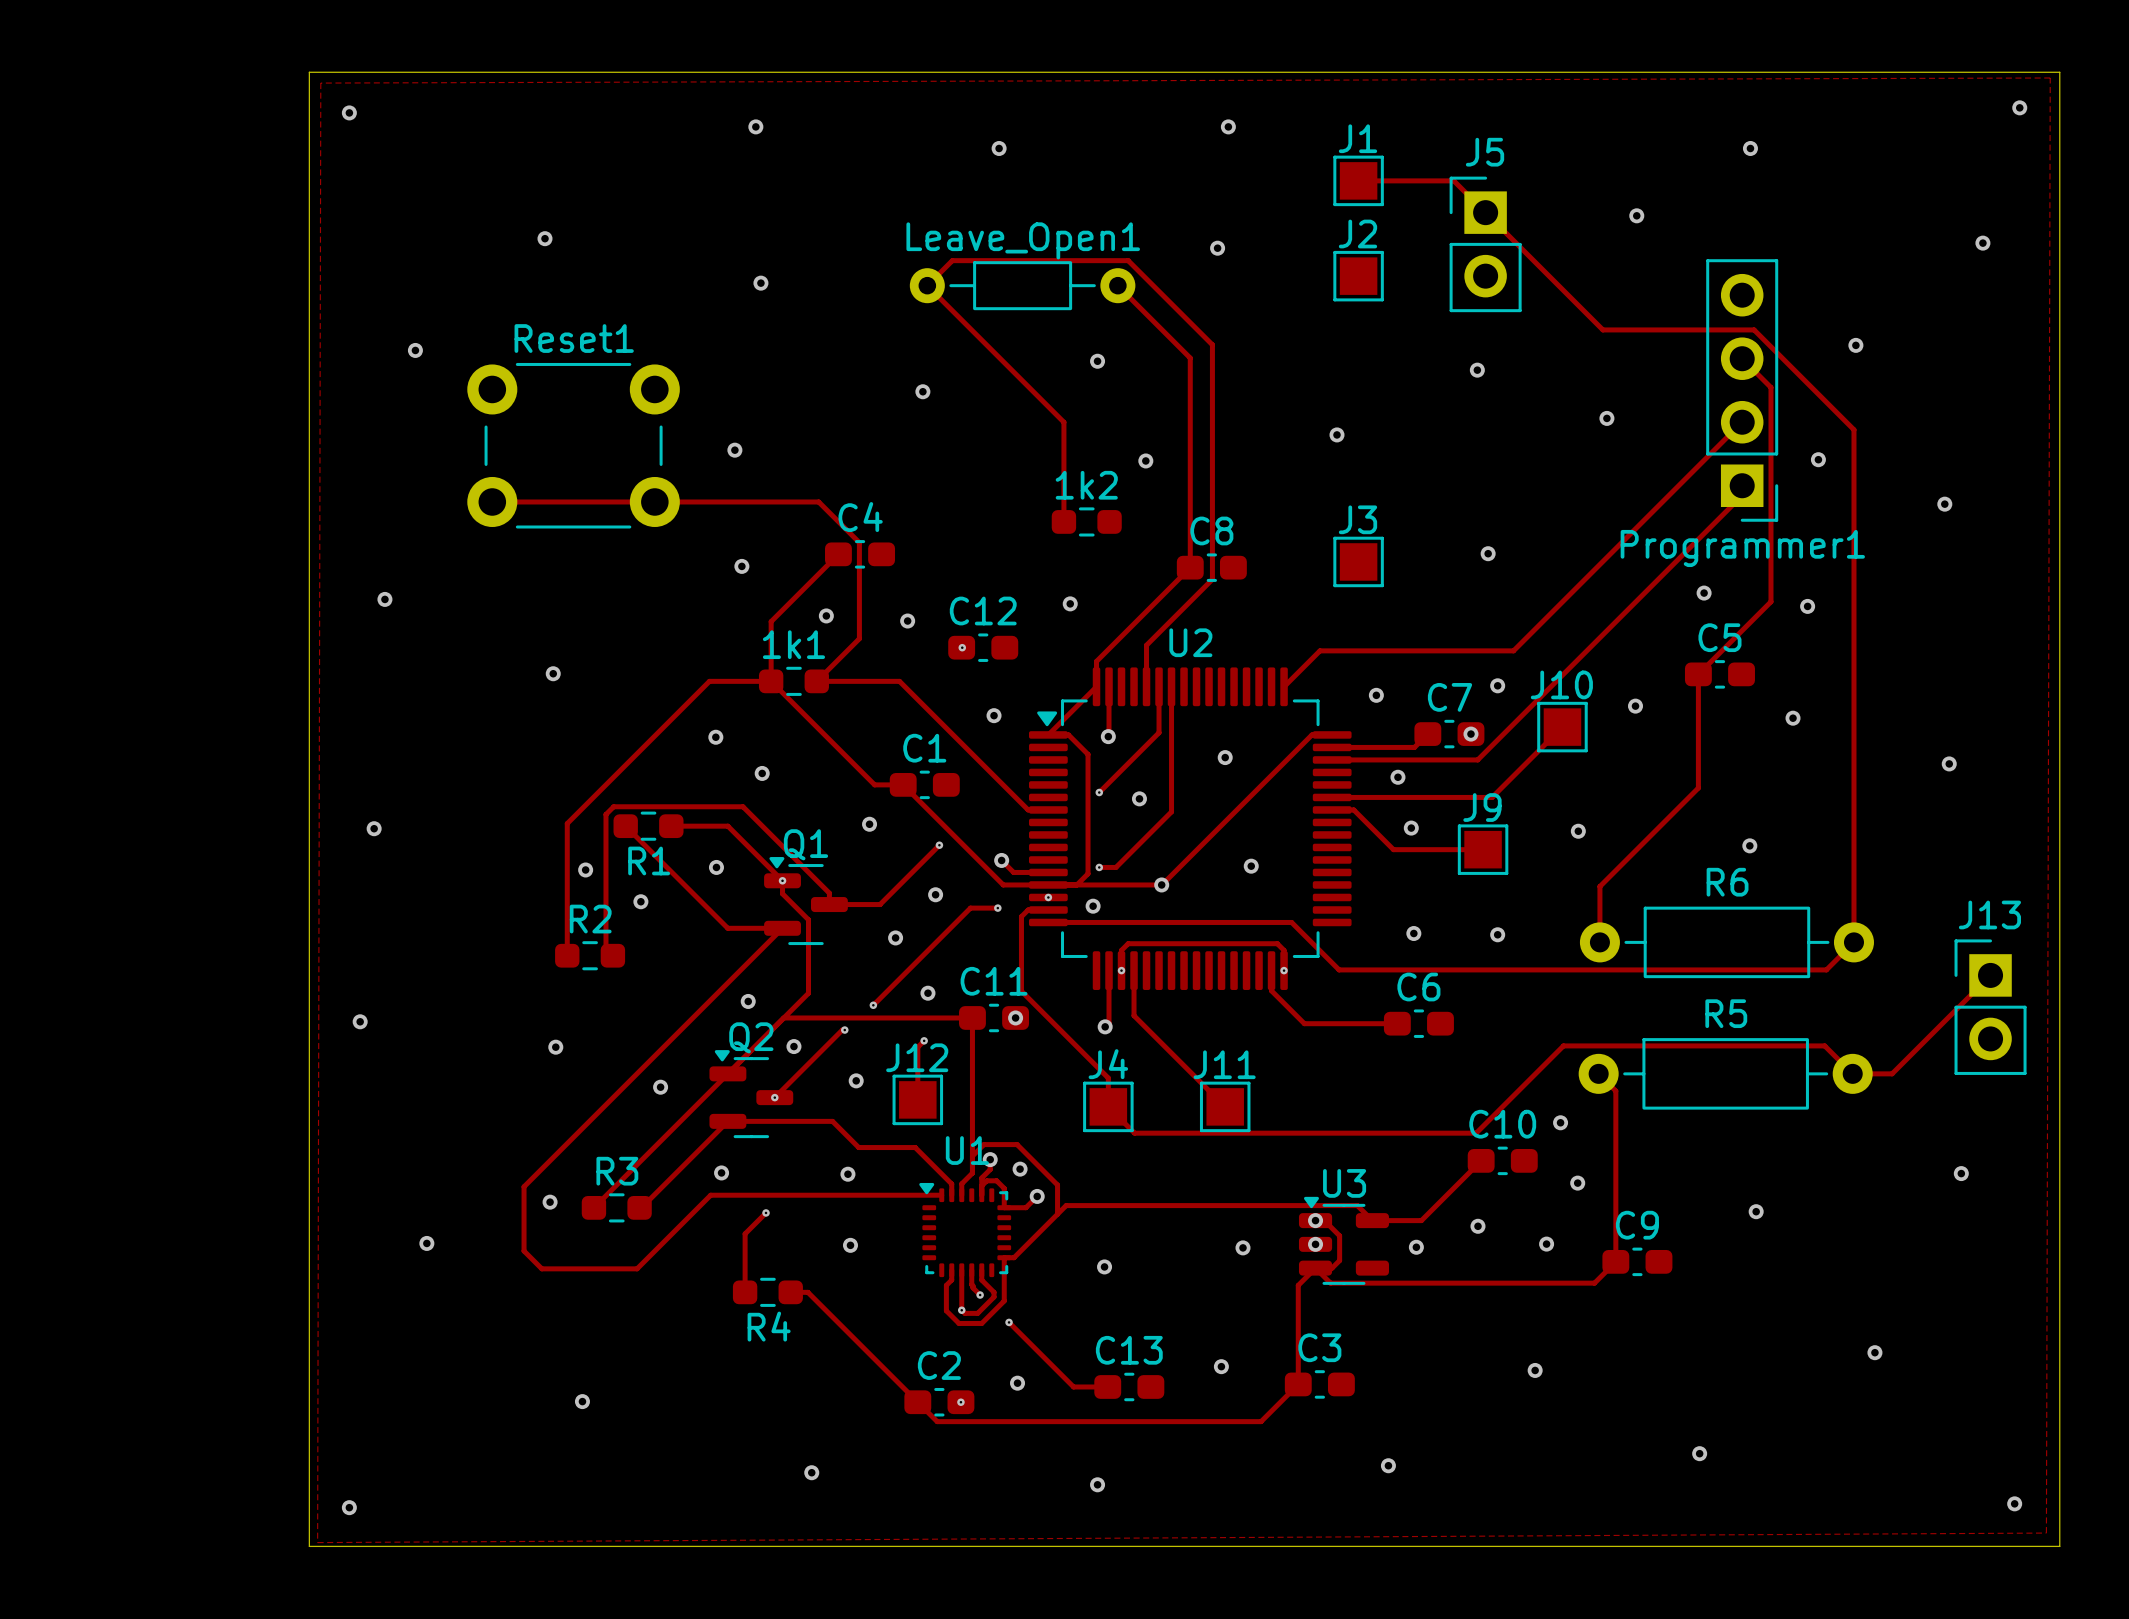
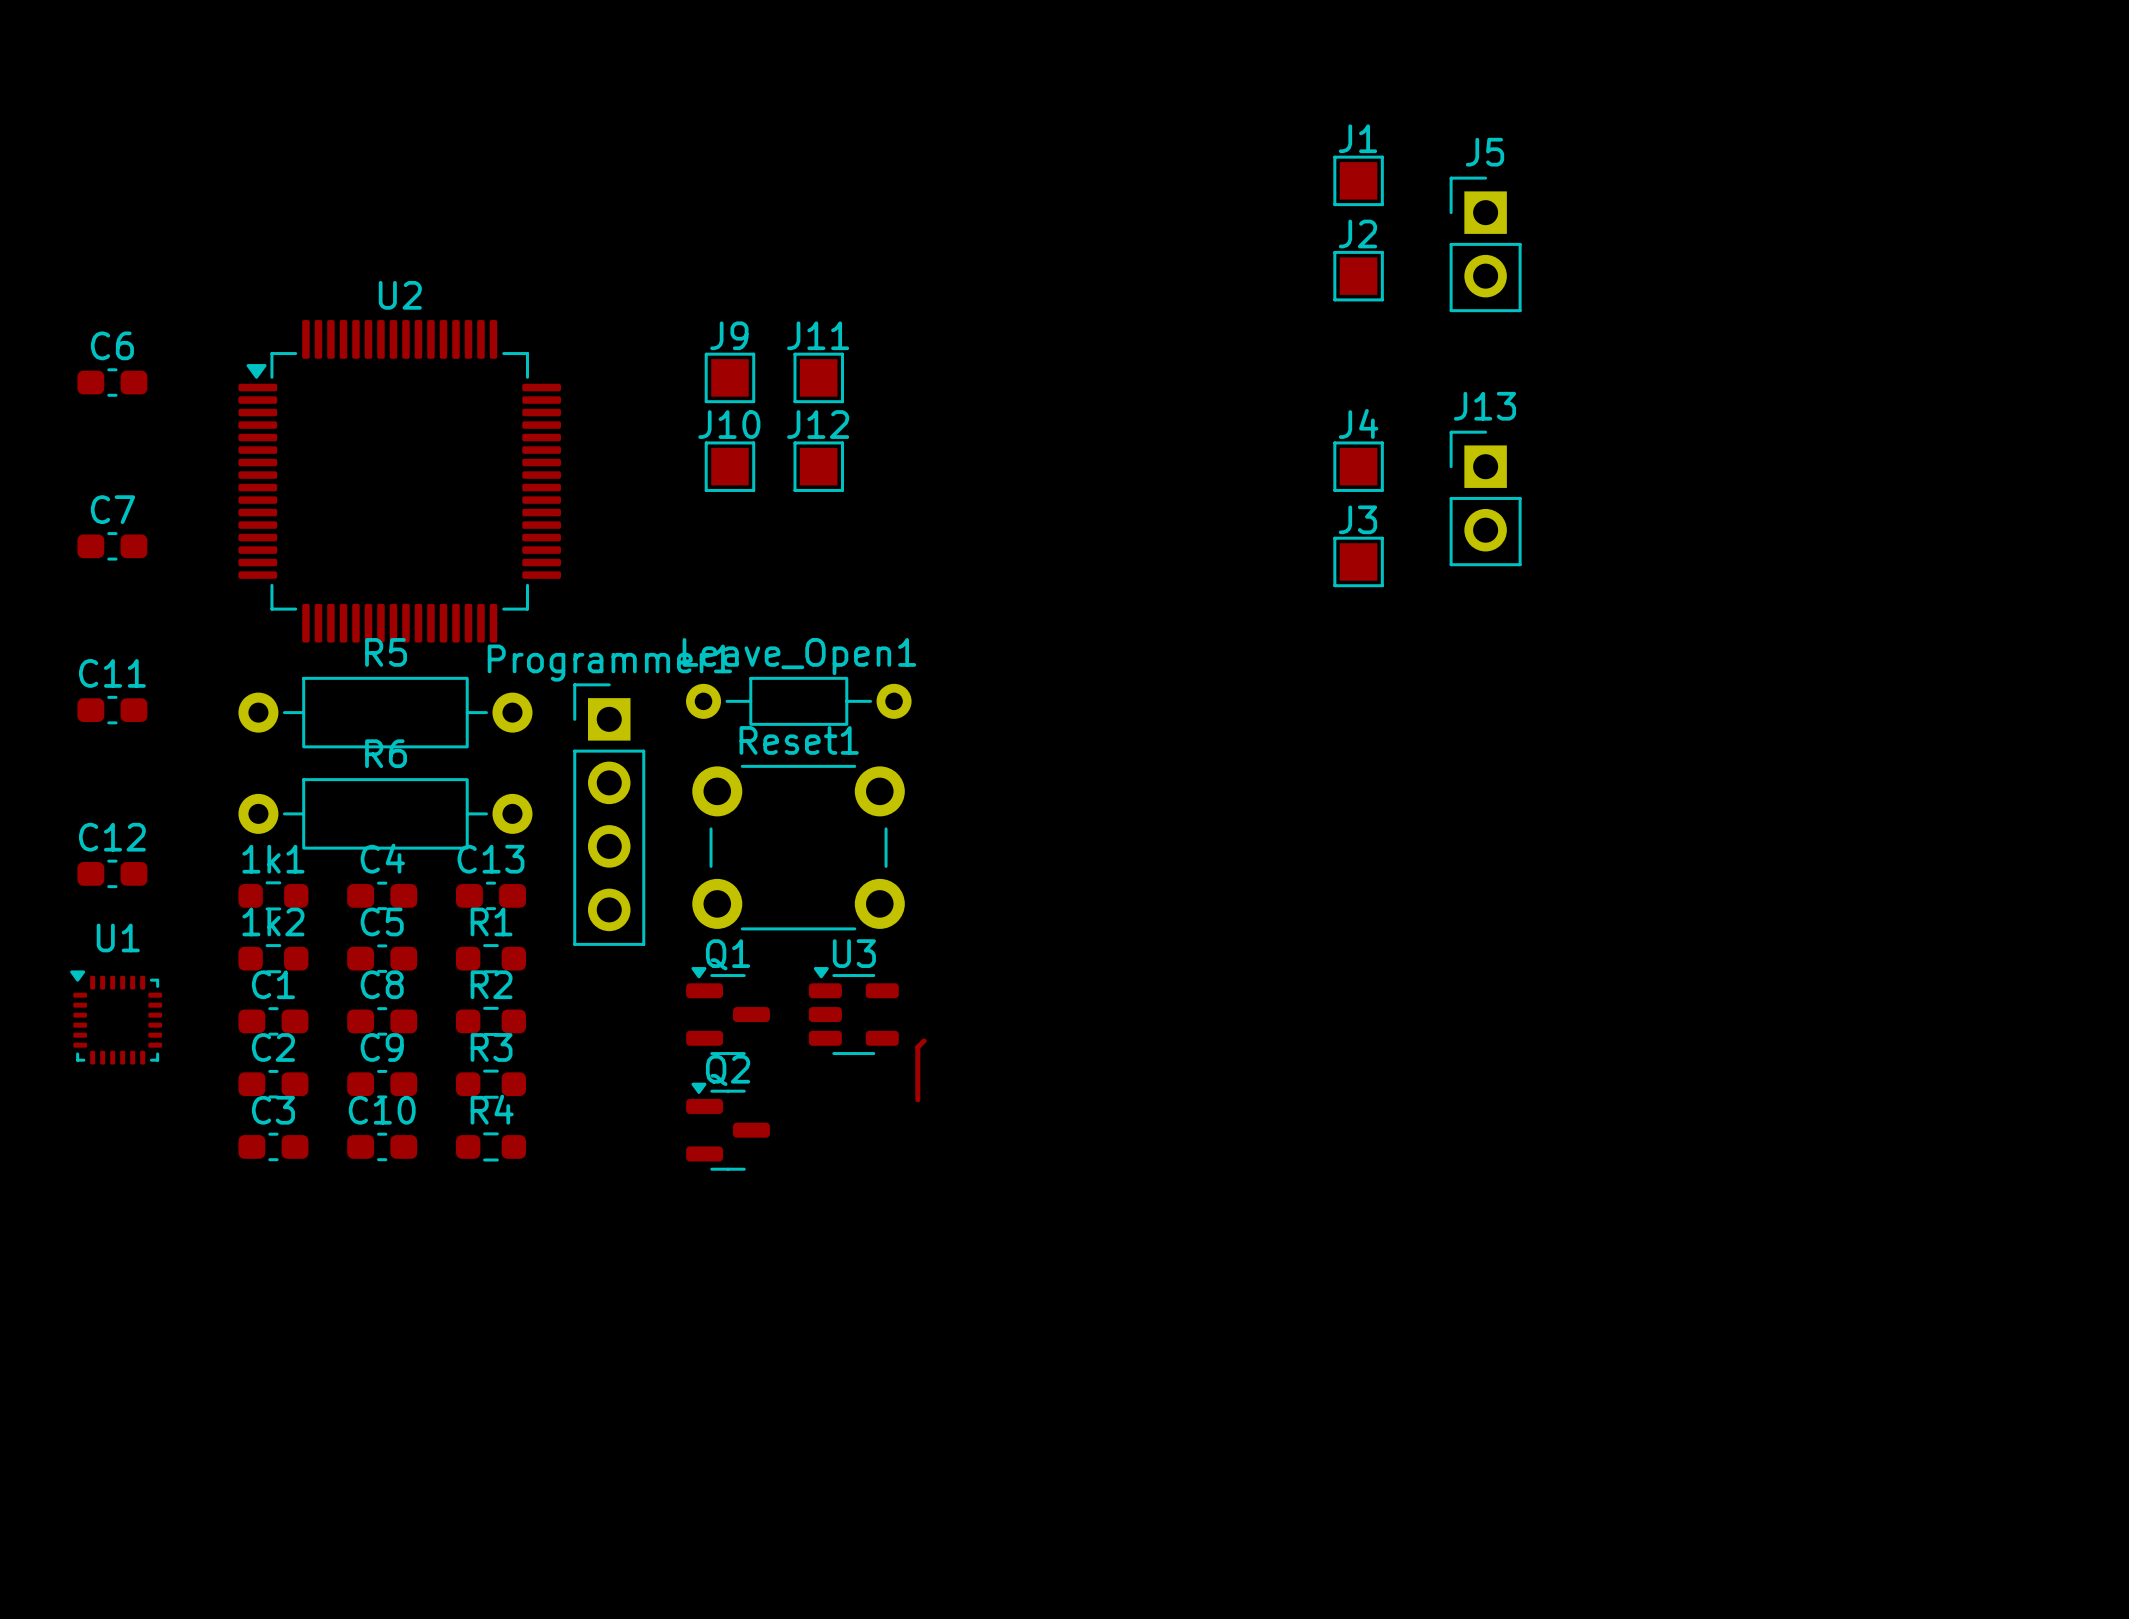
board edge: (309, 72) (2059, 72) (2059, 1546) (309, 1546) (309, 72) -> none
zone outline: (2050, 77) (2046, 1533) (317, 1542) (320, 83) (2050, 77) -> none
via: (2019, 107) -> none
via: (349, 112) -> none
via: (755, 126) -> none
via: (1228, 126) -> none
via: (999, 148) -> none
via: (1750, 148) -> none
track: (1358, 180) (1453, 180) (1602, 329) (1754, 329) (1853, 429) (1853, 942) (1826, 969) (1339, 969) (1291, 922) (1048, 922) -> none
via: (1636, 215) -> none
via: (544, 238) -> none
via: (1982, 243) -> none
via: (1217, 248) -> none
via: (760, 283) -> none
Leave_Open1 position: (1022, 285) -> (798, 701)
track: (1117, 285) (1190, 358) (1190, 567) (1096, 661) (1096, 686) (1048, 734) (1068, 734) (1088, 754) (1088, 873) (1076, 884) -> none
via: (1855, 345) -> none
via: (415, 350) -> none
track: (1742, 358) (1770, 387) (1770, 601) (1698, 674) (1698, 788) (1599, 886) (1599, 942) -> none
via: (1097, 361) -> none
via: (1477, 370) -> none
Programmer1 rotation: 0° (1742, 390) -> 180° (609, 814)
Programmer1 position: (1742, 390) -> (609, 814)
via: (922, 391) -> none
via: (1606, 418) -> none
track: (1742, 422) (1513, 650) (1319, 650) (1284, 686) -> none
via: (1336, 434) -> none
Reset1 position: (573, 445) -> (798, 847)
via: (734, 450) -> none
via: (1818, 459) -> none
via: (1145, 460) -> none
track: (1742, 485) (1742, 495) (1477, 759) (1332, 759) -> none
track: (492, 501) (818, 501) (859, 542) (859, 638) (816, 681) (899, 681) (1028, 809) (1048, 809) -> none
via: (1944, 504) -> none
track: (1063, 521) (1063, 422) (927, 285) (952, 260) (1128, 260) (1212, 344) (1212, 579) (1146, 645) (1146, 686) -> none
1k2 position: (1086, 521) -> (273, 958)
via: (1488, 553) -> none
track: (838, 554) (771, 621) (771, 681) -> none
C4 position: (860, 554) -> (382, 895)
via: (741, 566) -> none
C8 position: (1211, 567) -> (382, 1021)
via: (1704, 593) -> none
via: (384, 599) -> none
via: (1070, 603) -> none
via: (1807, 606) -> none
via: (826, 615) -> none
via: (907, 621) -> none
via: (962, 647) -> none
C12 position: (983, 647) -> (112, 873)
via: (553, 673) -> none
C5 position: (1719, 674) -> (382, 958)
track: (771, 681) (709, 681) (567, 823) (567, 955) -> none
track: (771, 681) (874, 784) (903, 784) (1003, 884) (1161, 884) (1311, 734) (1332, 734) -> none
1k1 position: (793, 681) -> (273, 895)
via: (1497, 685) -> none
track: (1109, 686) (1108, 736) -> none
track: (1159, 686) (1159, 732) (1099, 792) -> none
track: (1171, 686) (1171, 811) (1115, 867) (1099, 867) -> none
via: (1376, 695) -> none
via: (1635, 706) -> none
via: (994, 715) -> none
via: (1793, 718) -> none
track: (1562, 727) (1492, 797) (1332, 797) -> none
J10 position: (1562, 727) -> (729, 466)
track: (1427, 734) (1414, 747) (1332, 747) -> none
C7 position: (1449, 734) -> (112, 546)
via: (1470, 734) -> none
via: (1108, 736) -> none
via: (715, 737) -> none
via: (1225, 757) -> none
via: (1949, 763) -> none
via: (762, 773) -> none
via: (1397, 777) -> none
C1 position: (924, 784) -> (273, 1021)
via: (1099, 792) -> none
via: (1139, 798) -> none
track: (1332, 809) (1353, 809) (1393, 849) (1483, 849) -> none
via: (869, 824) -> none
track: (625, 826) (727, 928) (782, 928) (524, 1186) (524, 1251) (541, 1268) (637, 1268) (710, 1195) (941, 1195) -> none
R1 position: (648, 826) -> (490, 958)
track: (671, 826) (727, 826) (782, 880) (782, 893) (808, 919) (808, 993) (593, 1207) -> none
via: (374, 828) -> none
U2 position: (1190, 828) -> (399, 481)
via: (1411, 828) -> none
via: (1578, 831) -> none
track: (939, 845) (880, 904) (829, 904) (829, 893) (743, 806) (613, 806) (605, 814) (605, 948) (612, 955) -> none
via: (939, 845) -> none
via: (1749, 845) -> none
J9 position: (1483, 849) -> (729, 377)
R1 name position: R1 (649, 860) -> R1 (491, 921)
track: (1001, 860) (1013, 872) (1048, 872) -> none
via: (1001, 860) -> none
via: (1251, 866) -> none
via: (716, 867) -> none
via: (1099, 867) -> none
via: (585, 869) -> none
via: (782, 880) -> none
via: (1161, 884) -> none
via: (935, 894) -> none
via: (1048, 897) -> none
via: (640, 901) -> none
Q1 position: (805, 901) -> (728, 1011)
via: (1093, 906) -> none
track: (997, 908) (970, 908) (873, 1005) -> none
via: (997, 908) -> none
track: (1048, 909) (1028, 909) (1021, 916) (1021, 991) (1108, 1078) (1108, 1106) (1134, 1133) (1476, 1133) (1563, 1045) (1824, 1045) (1852, 1073) (1892, 1073) (1990, 975) -> none
via: (1413, 933) -> none
via: (1497, 934) -> none
via: (895, 937) -> none
R6 position: (1726, 942) -> (385, 813)
R2 position: (590, 955) -> (490, 1021)
track: (1109, 970) (1109, 1023) (1105, 1026) -> none
track: (1121, 970) (1121, 950) (1128, 943) (1277, 943) (1284, 950) (1284, 970) -> none
via: (1121, 970) -> none
track: (1134, 970) (1134, 1015) (1225, 1106) -> none
track: (1271, 970) (1271, 990) (1304, 1023) (1397, 1023) -> none
via: (1284, 970) -> none
via: (927, 993) -> none
via: (748, 1001) -> none
via: (873, 1005) -> none
J13 position: (1990, 1007) -> (1485, 498)
track: (783, 1017) (972, 1017) (972, 1173) (961, 1183) (961, 1195) -> none
C11 position: (994, 1017) -> (112, 710)
via: (1015, 1017) -> none
via: (360, 1021) -> none
C6 position: (1418, 1023) -> (112, 382)
via: (1105, 1026) -> none
track: (844, 1030) (842, 1030) (774, 1097) -> none
via: (844, 1030) -> none
via: (924, 1040) -> none
via: (793, 1046) -> none
via: (555, 1047) -> none
track: (1598, 1073) (1615, 1091) (1615, 1261) (1594, 1283) (1330, 1283) (1315, 1268) -> none
R5 position: (1725, 1073) -> (385, 712)
via: (856, 1080) -> none
via: (660, 1087) -> none
Q2 position: (751, 1094) -> (728, 1126)
via: (774, 1097) -> none
J12 position: (917, 1099) -> (818, 466)
J4 position: (1108, 1106) -> (1358, 466)
J11 position: (1225, 1106) -> (818, 377)
via: (1560, 1122) -> none
track: (972, 1156) (983, 1144) (1017, 1144) (1057, 1185) (1057, 1214) -> none
track: (990, 1159) (990, 1169) (981, 1178) (981, 1195) -> none
via: (990, 1159) -> none
track: (1481, 1160) (1421, 1220) (1372, 1220) (1357, 1205) (1066, 1205) (1014, 1257) (1004, 1257) (1004, 1300) (981, 1323) (959, 1323) (946, 1310) (946, 1285) (951, 1280) (951, 1270) -> none
C10 position: (1502, 1160) -> (382, 1146)
via: (1020, 1169) -> none
via: (721, 1172) -> none
via: (1961, 1173) -> none
via: (847, 1174) -> none
via: (1577, 1183) -> none
track: (981, 1185) (986, 1180) (996, 1180) (1004, 1188) (1004, 1207) (1025, 1207) (1037, 1196) -> none
track: (951, 1195) (951, 1184) (915, 1147) (858, 1147) (832, 1121) (727, 1121) (639, 1207) -> none
via: (1037, 1196) -> none
via: (550, 1202) -> none
R3 position: (616, 1207) -> (490, 1084)
via: (1756, 1211) -> none
track: (766, 1212) (745, 1233) (745, 1292) -> none
via: (766, 1212) -> none
track: (1315, 1220) (1324, 1220) (1339, 1235) (1339, 1260) (1332, 1268) (1315, 1268) -> none
via: (1315, 1220) -> none
via: (1477, 1226) -> none
U1 position: (965, 1230) -> (116, 1017)
U3 position: (1343, 1240) -> (853, 1011)
via: (426, 1243) -> none
via: (1315, 1244) -> none
via: (1546, 1244) -> none
via: (850, 1245) -> none
via: (1242, 1247) -> none
via: (1416, 1247) -> none
C9 position: (1637, 1261) -> (382, 1084)
via: (1104, 1266) -> none
track: (1315, 1268) (1298, 1285) (1298, 1384) (1261, 1421) (937, 1421) (807, 1292) (790, 1292) -> none
track: (961, 1270) (961, 1310) (964, 1313) (977, 1313) (994, 1297) (994, 1292) (981, 1280) (981, 1270) -> none
track: (971, 1270) (971, 1284) (980, 1295) -> none
R4 position: (767, 1292) -> (490, 1146)
via: (980, 1295) -> none
via: (961, 1310) -> none
track: (1009, 1322) (1073, 1386) (1107, 1386) -> none
via: (1009, 1322) -> none
R4 name position: R4 (769, 1326) -> R4 (492, 1109)
via: (1874, 1352) -> none
via: (1221, 1366) -> none
via: (1535, 1370) -> none
via: (1017, 1383) -> none
C3 position: (1319, 1384) -> (273, 1146)
C13 position: (1129, 1386) -> (490, 895)
via: (582, 1401) -> none
C2 position: (939, 1402) -> (273, 1084)
via: (960, 1402) -> none
via: (1699, 1453) -> none
via: (1388, 1465) -> none
via: (811, 1472) -> none
via: (1097, 1484) -> none
via: (2014, 1503) -> none
via: (349, 1507) -> none

